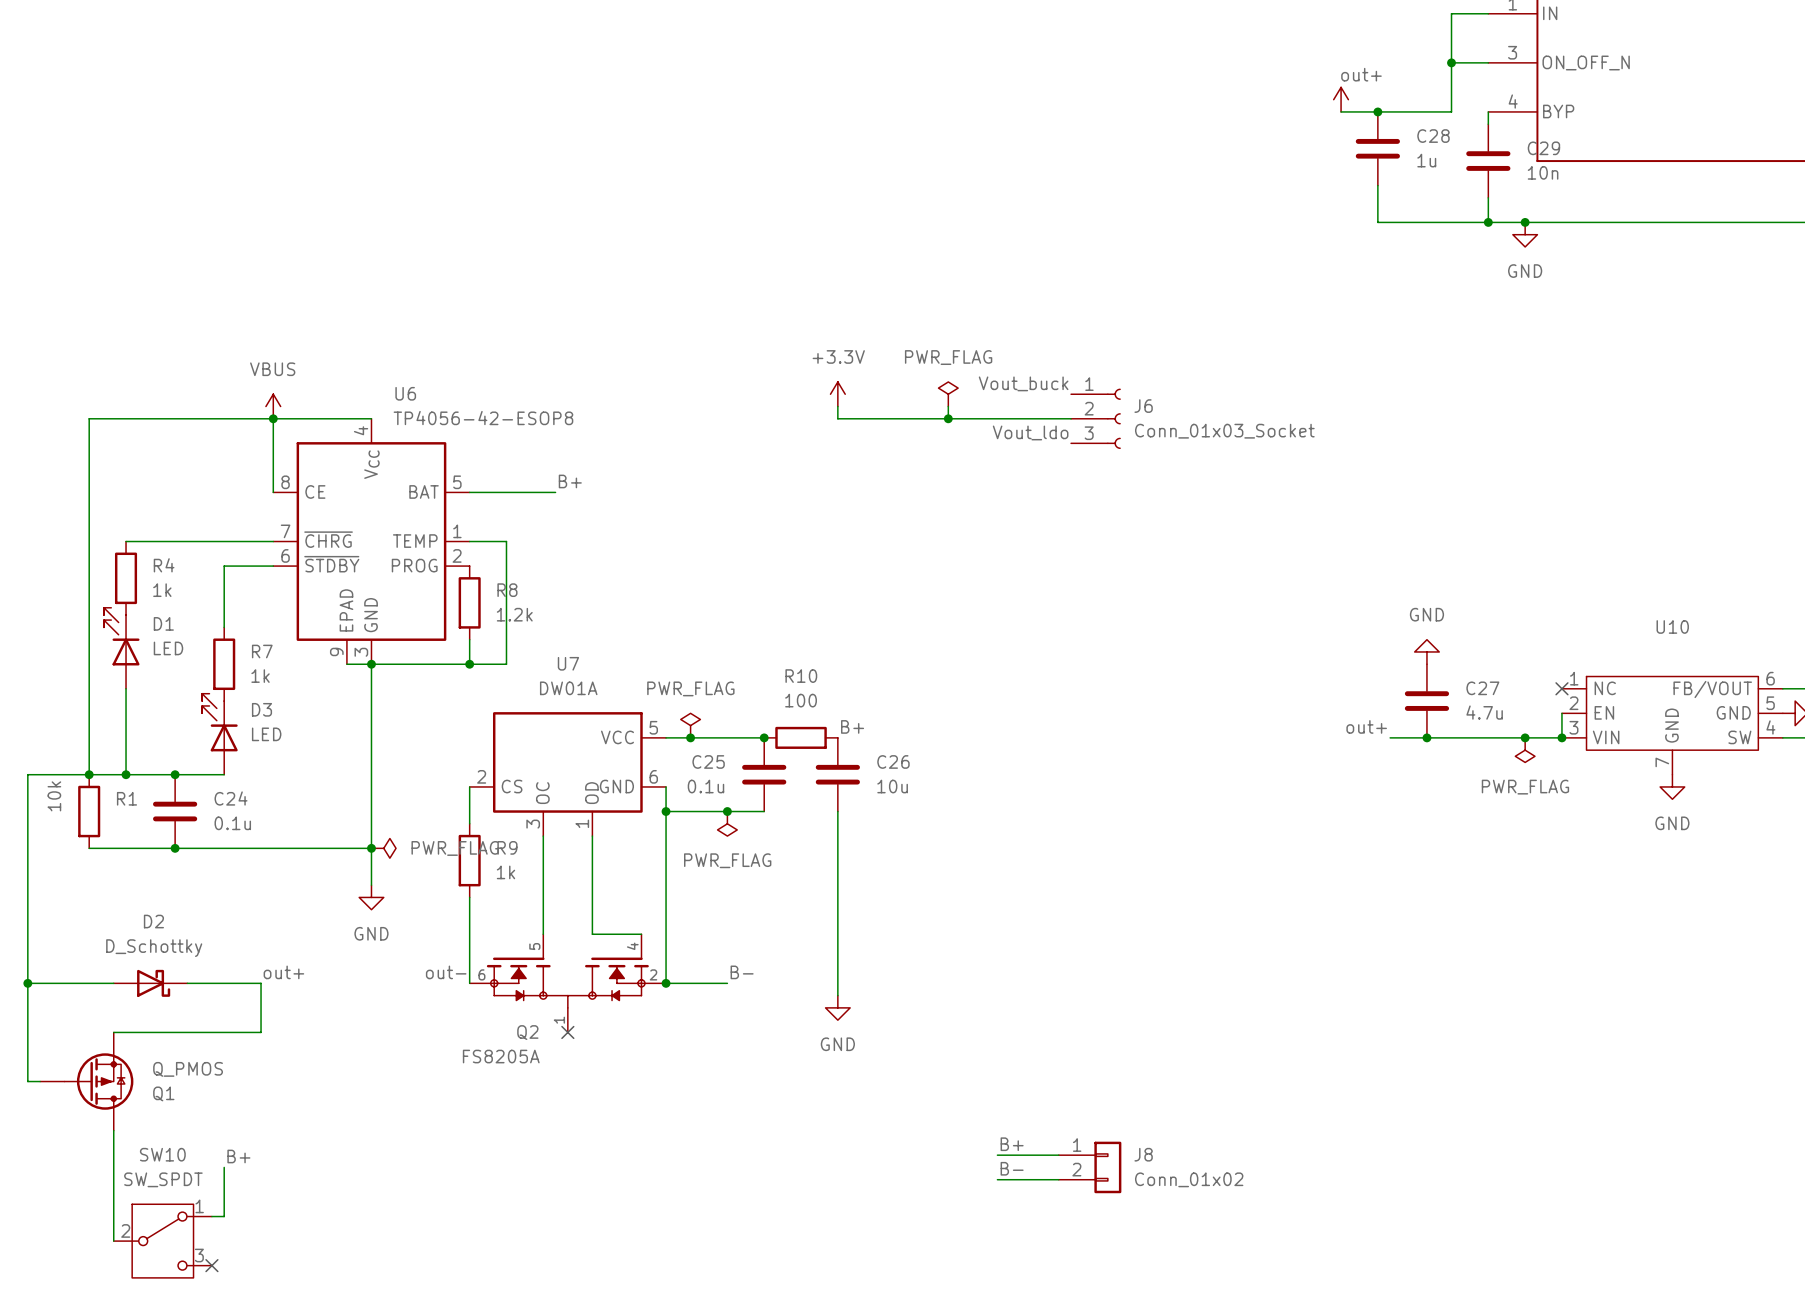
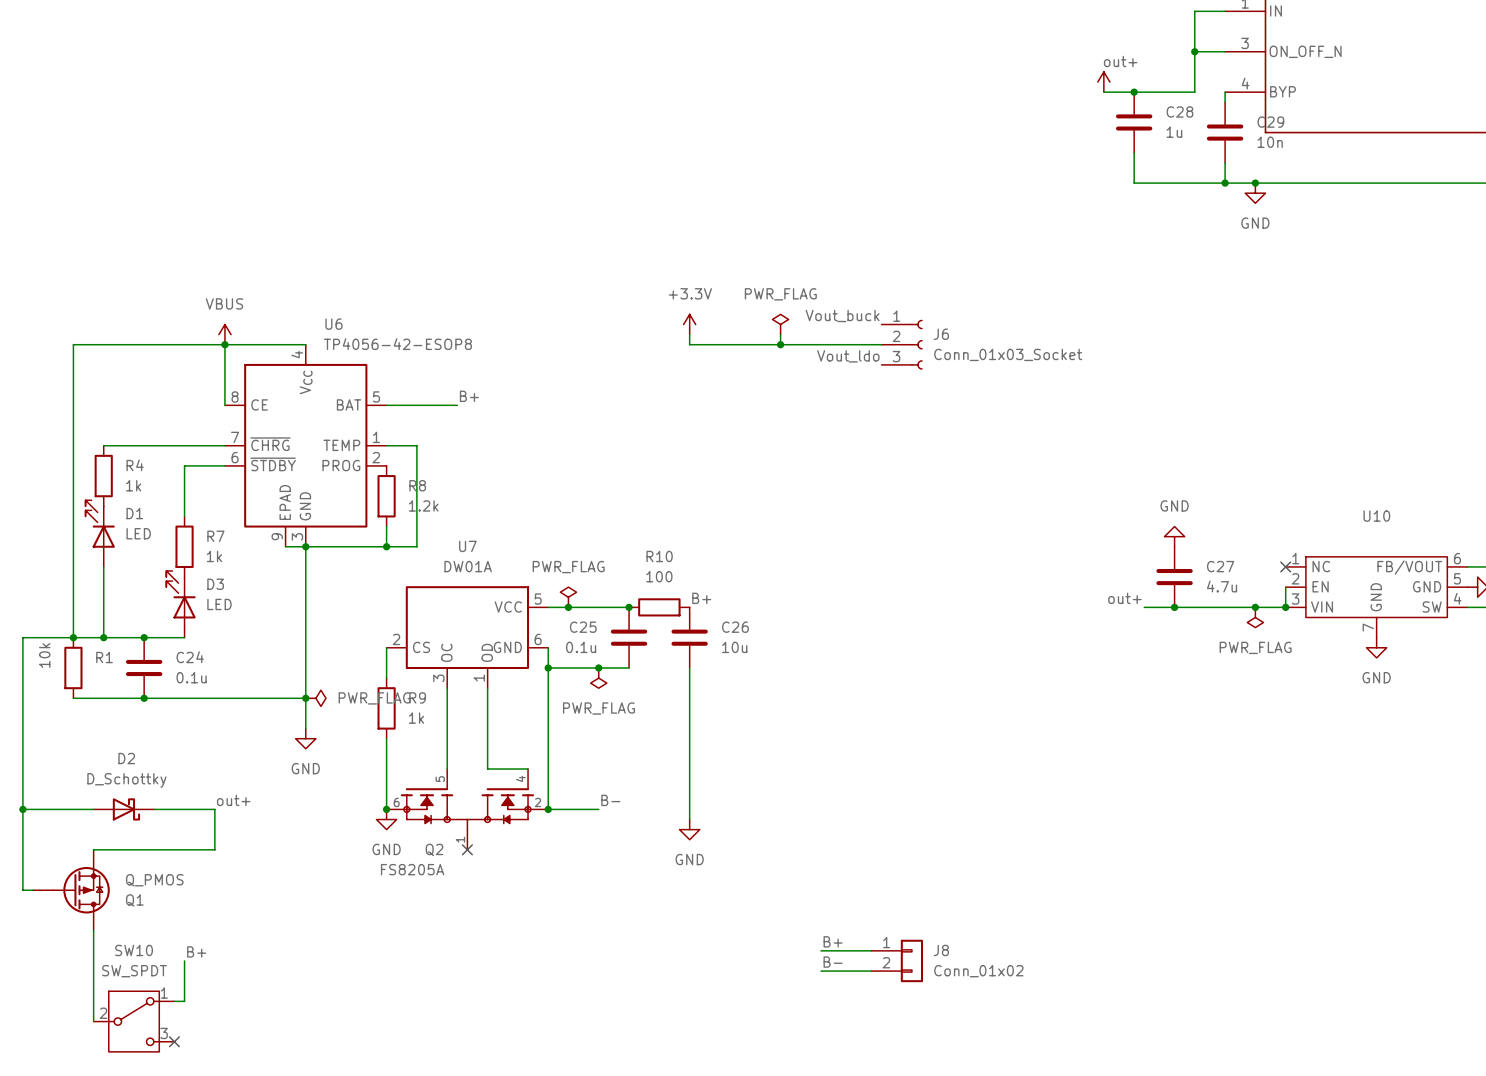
label: out- (446, 972) -> none
junction: none -> (386, 809)
power symbol: none -> GND (386, 819)

